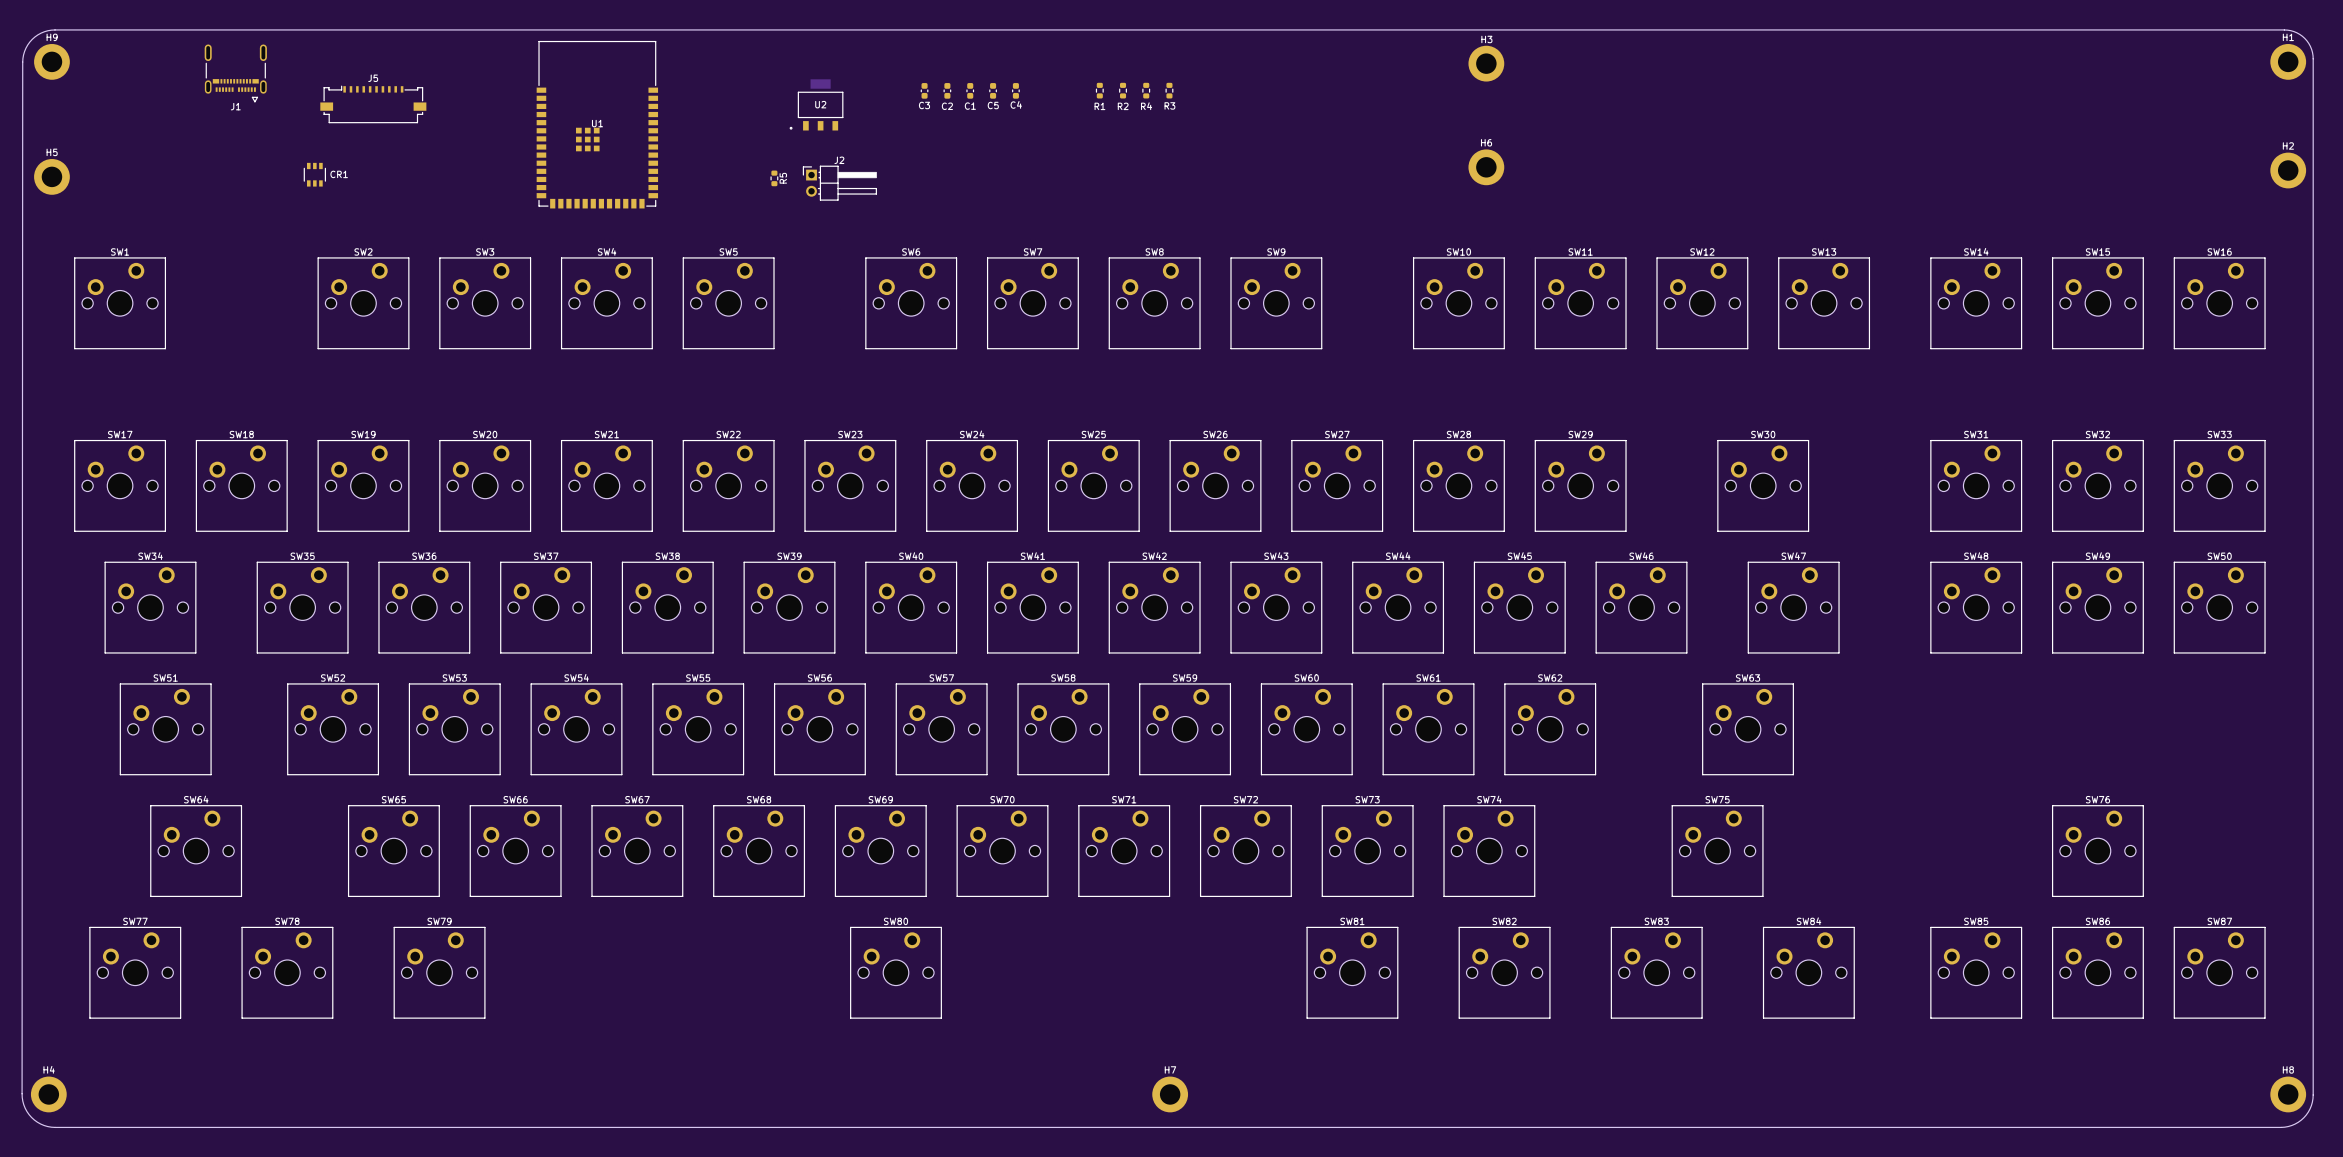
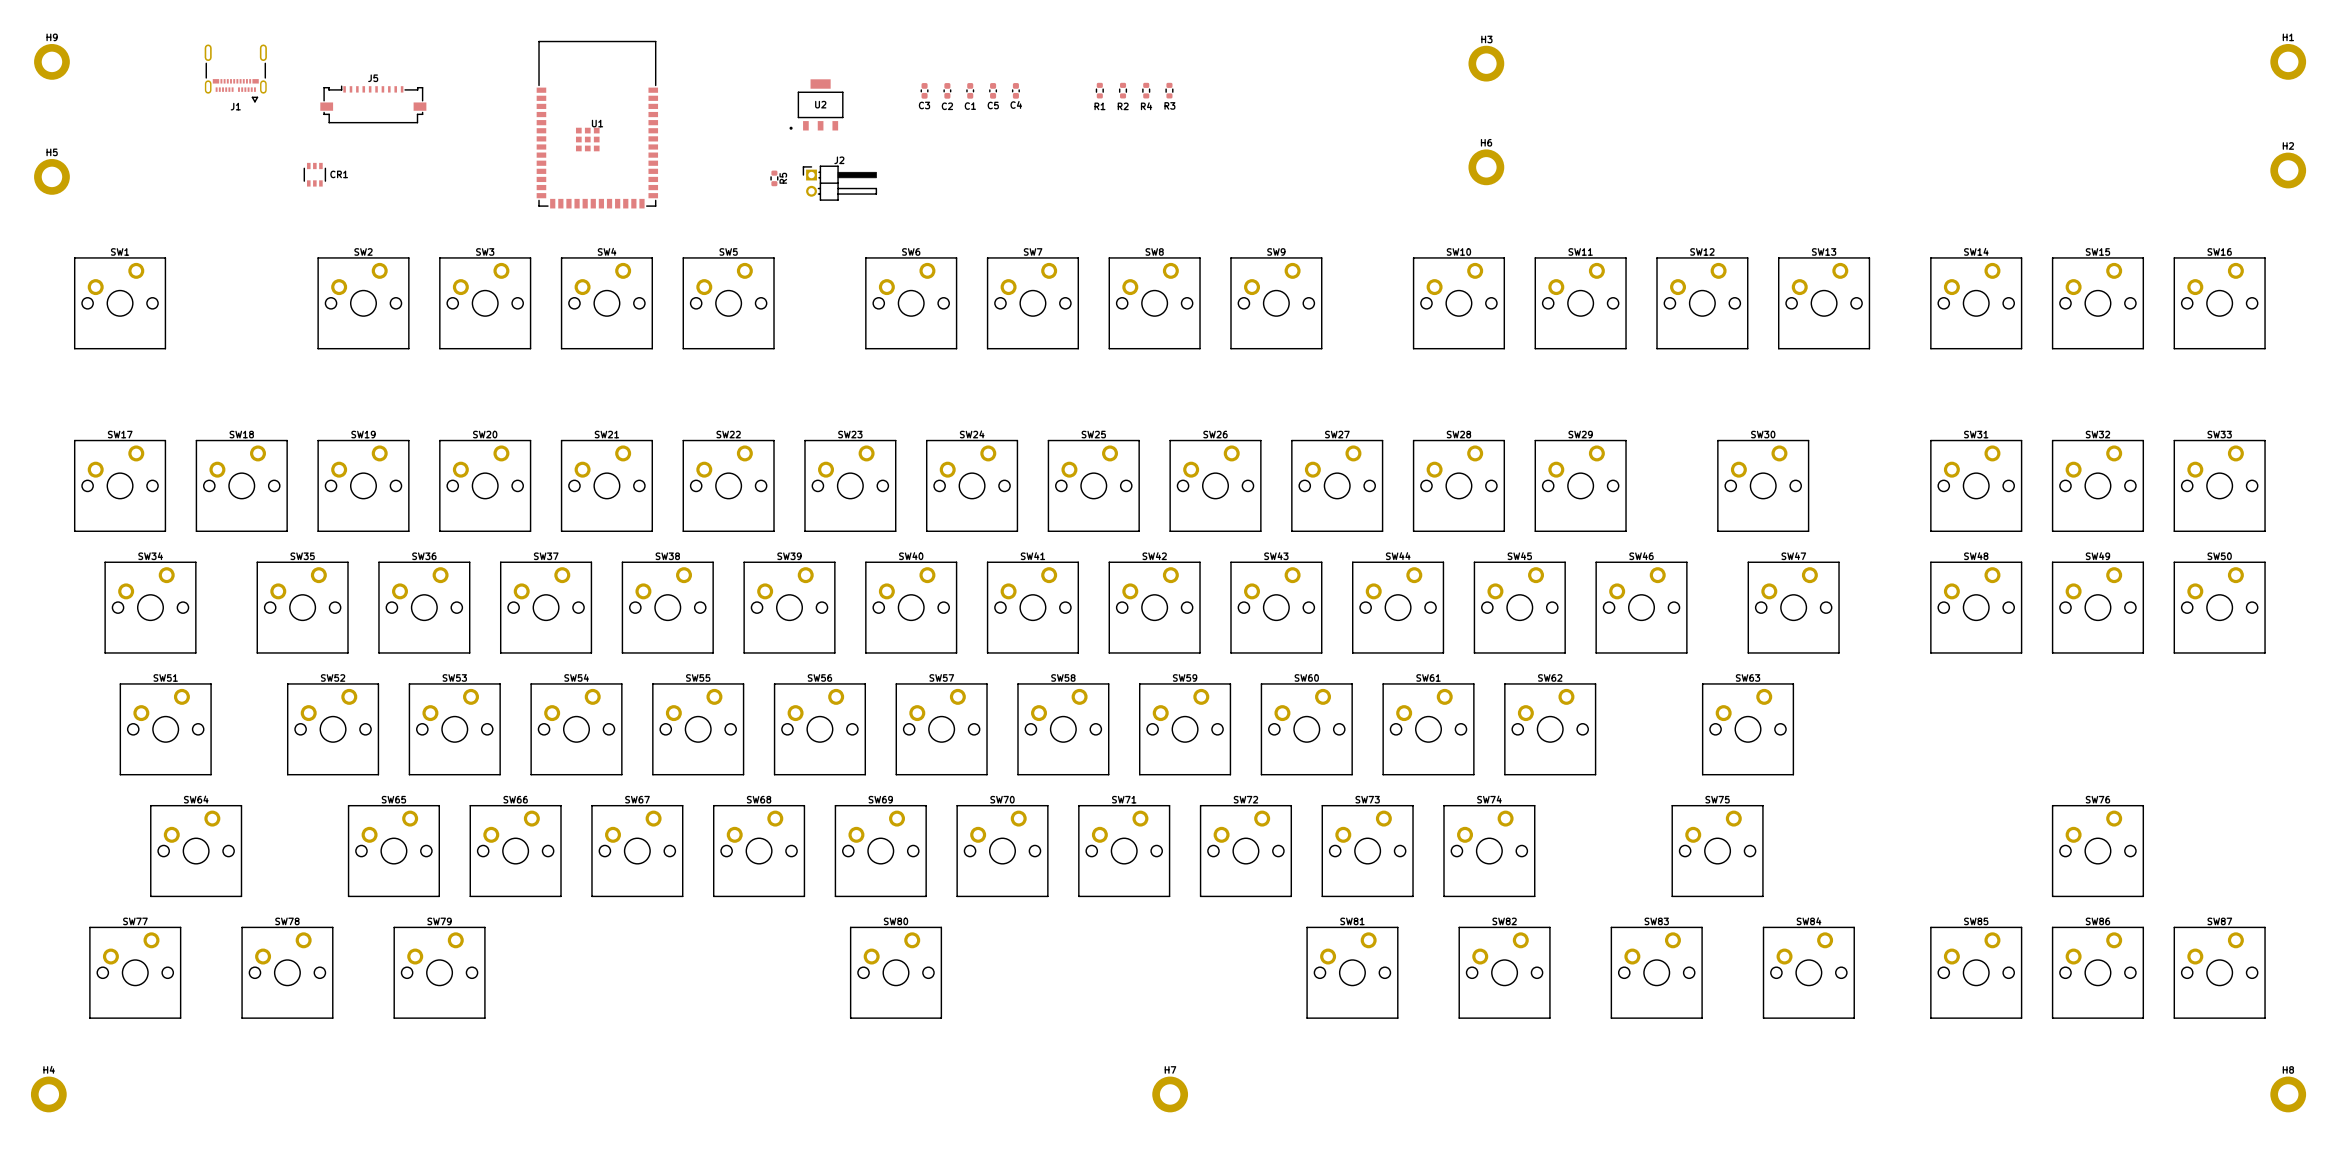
board edge: (55, 29) (2284, 29) (2296, 32) (2308, 43) (2313, 58) (2313, 1094) (2310, 1108) (2298, 1122) (2281, 1127) (55, 1127) (40, 1124) (26, 1111) (22, 1093) (22, 62) (24, 51) (32, 39) (44, 31) (55, 29) -> none

